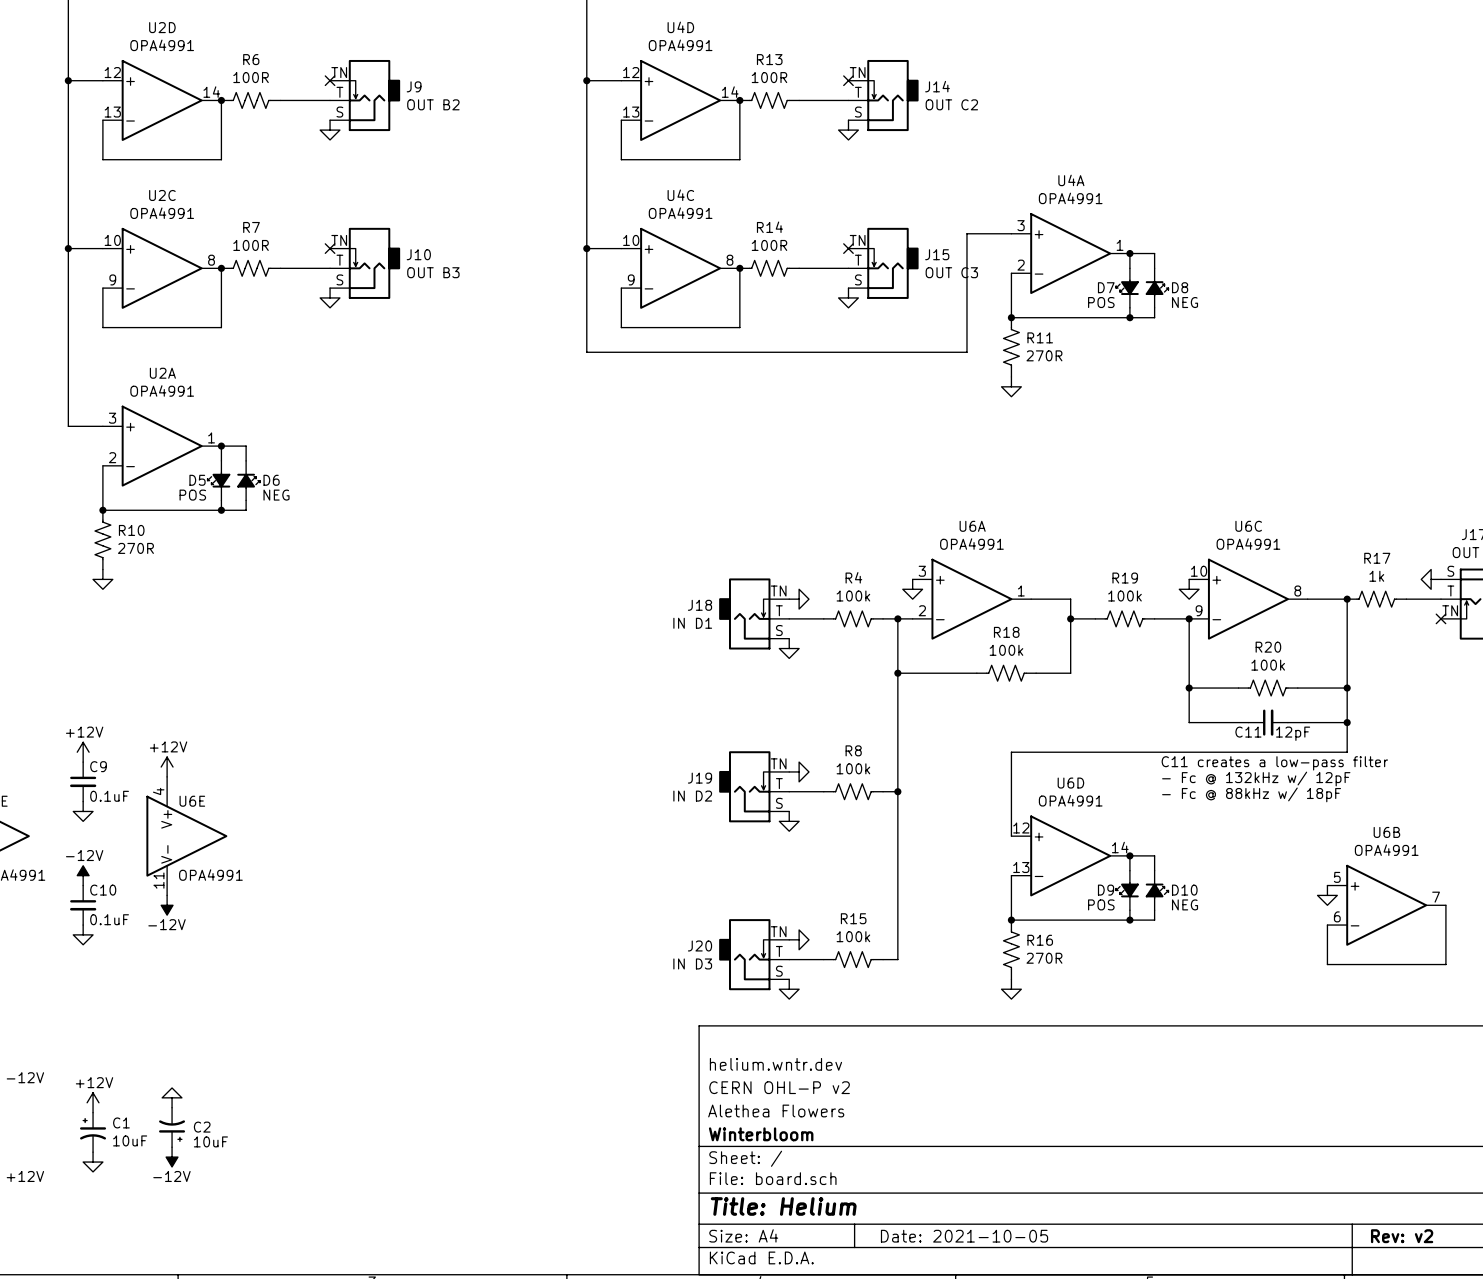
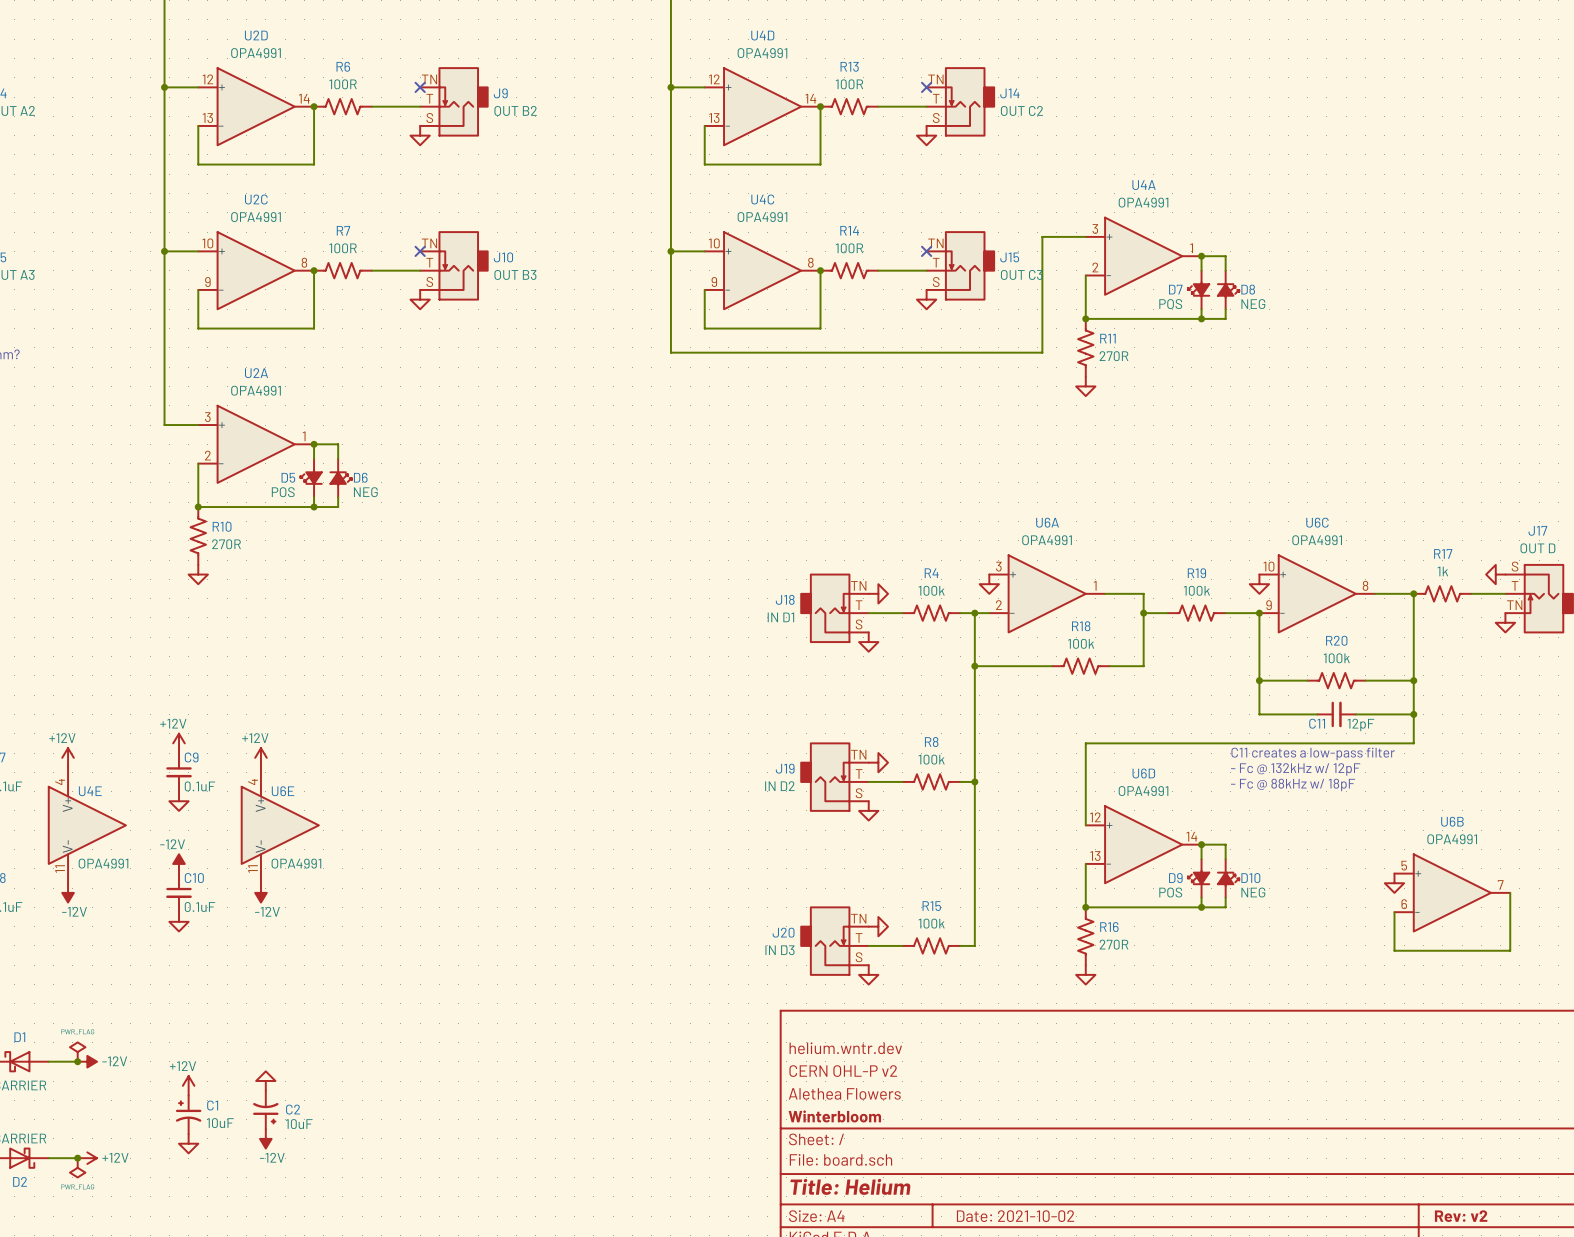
no-connect mark: (1440, 618) -> none
power symbol: none -> (1505, 622)
title block: Date: 2021-10-05 (964, 1236) -> Date: 2021-10-02 (1015, 1216)

